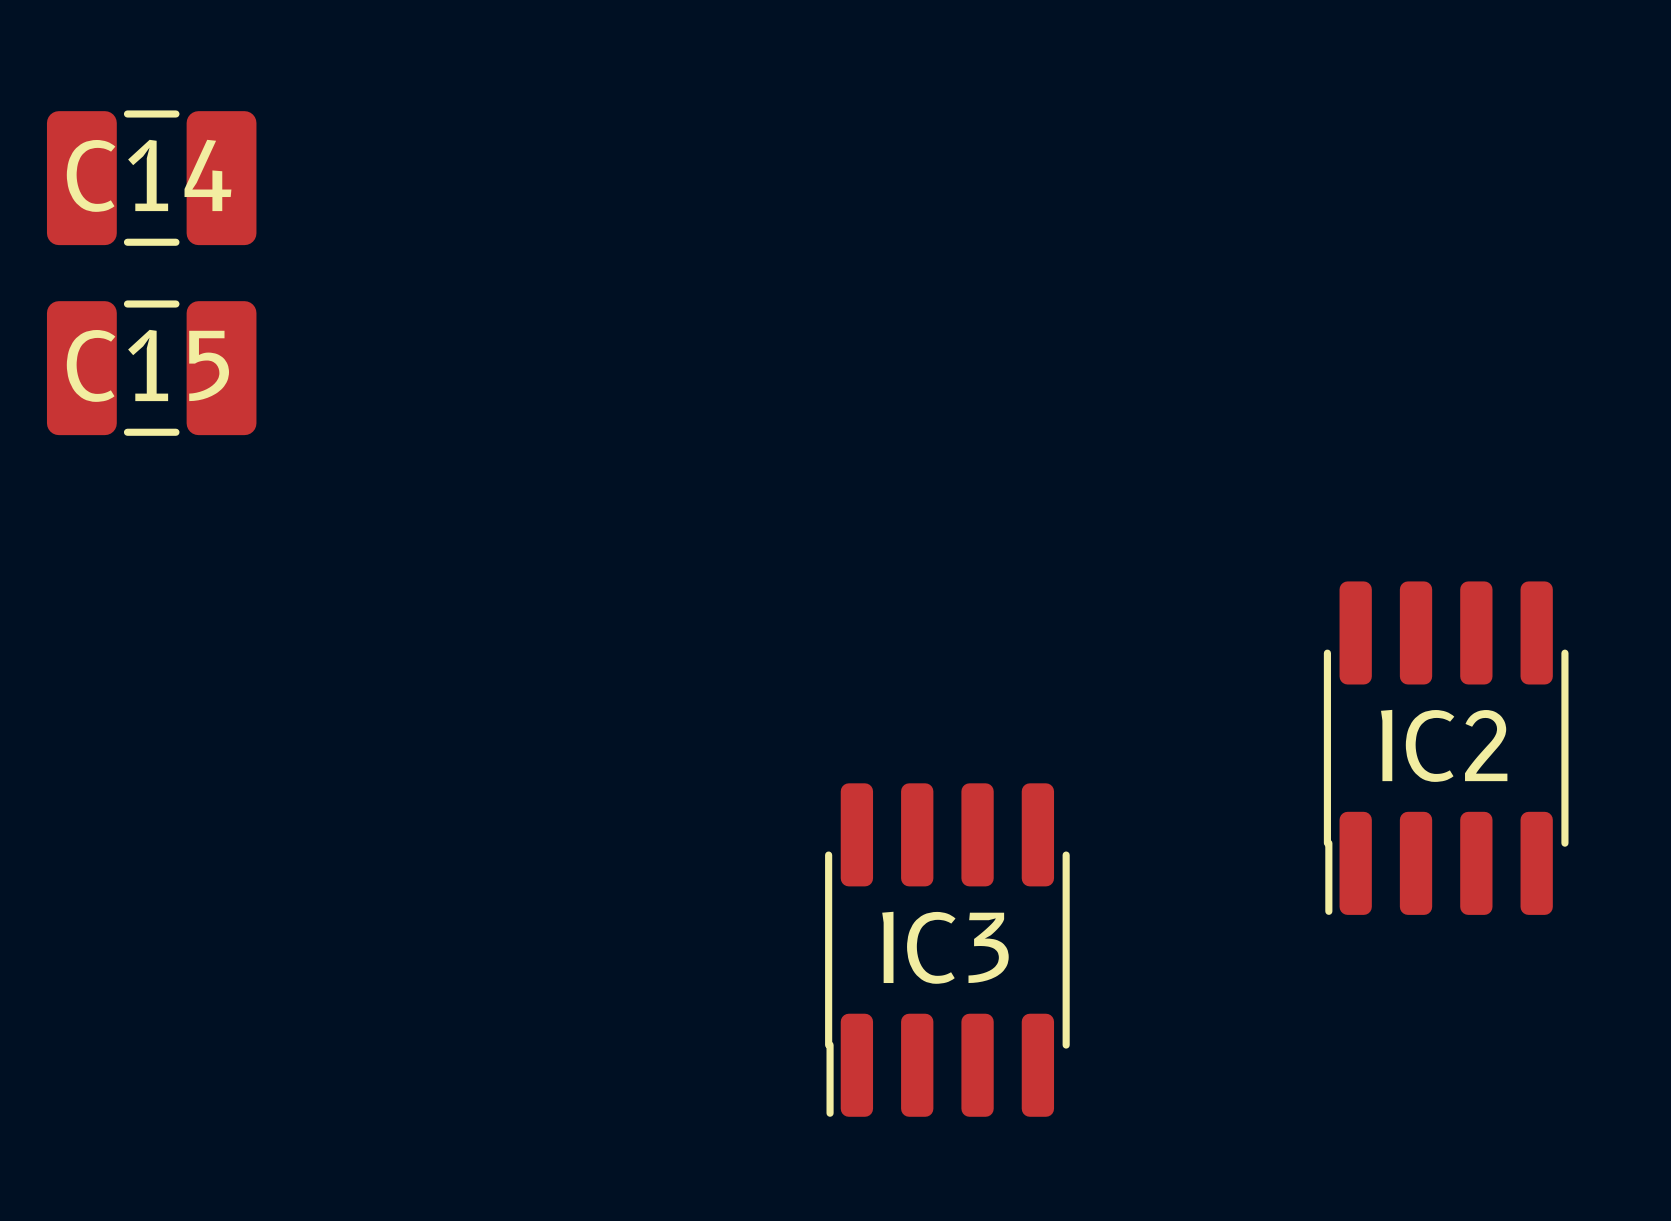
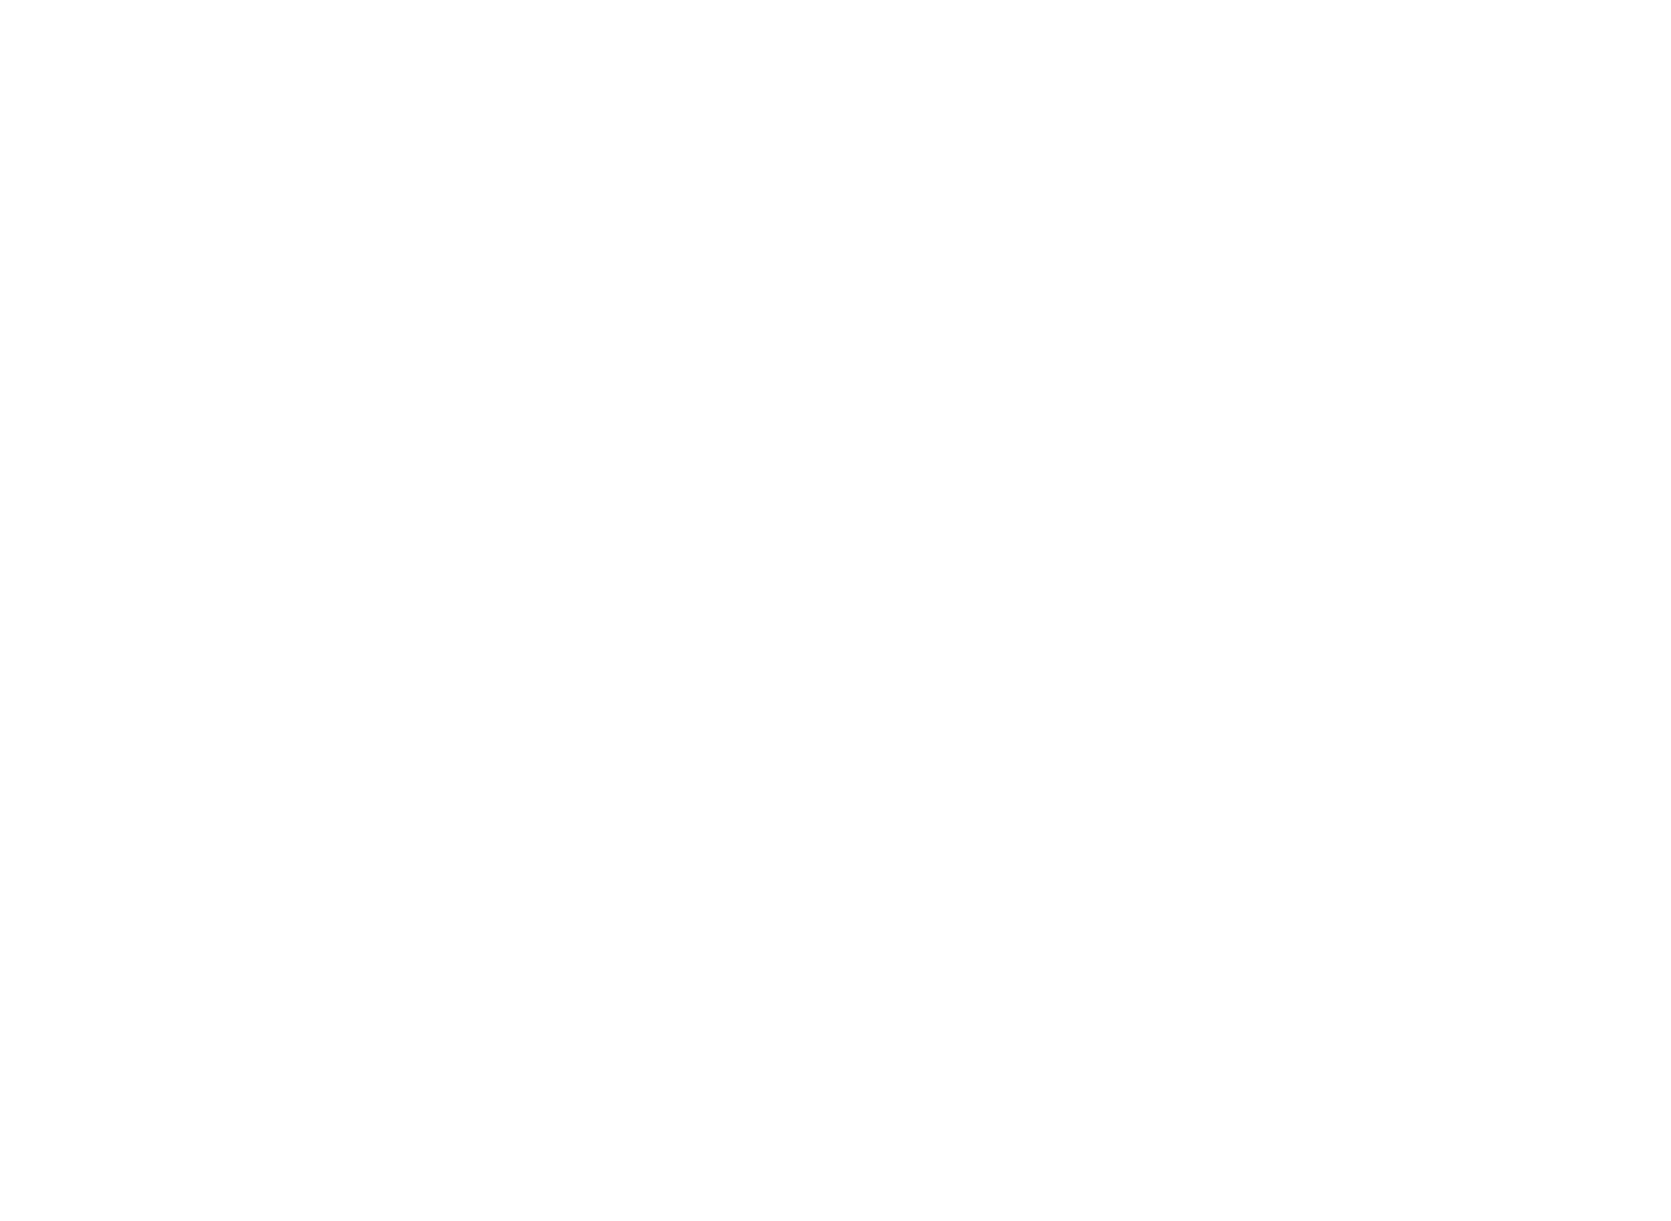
C14: (151, 178) -> none
C15: (151, 368) -> none
IC2: (1446, 748) -> none
IC3: (947, 950) -> none

